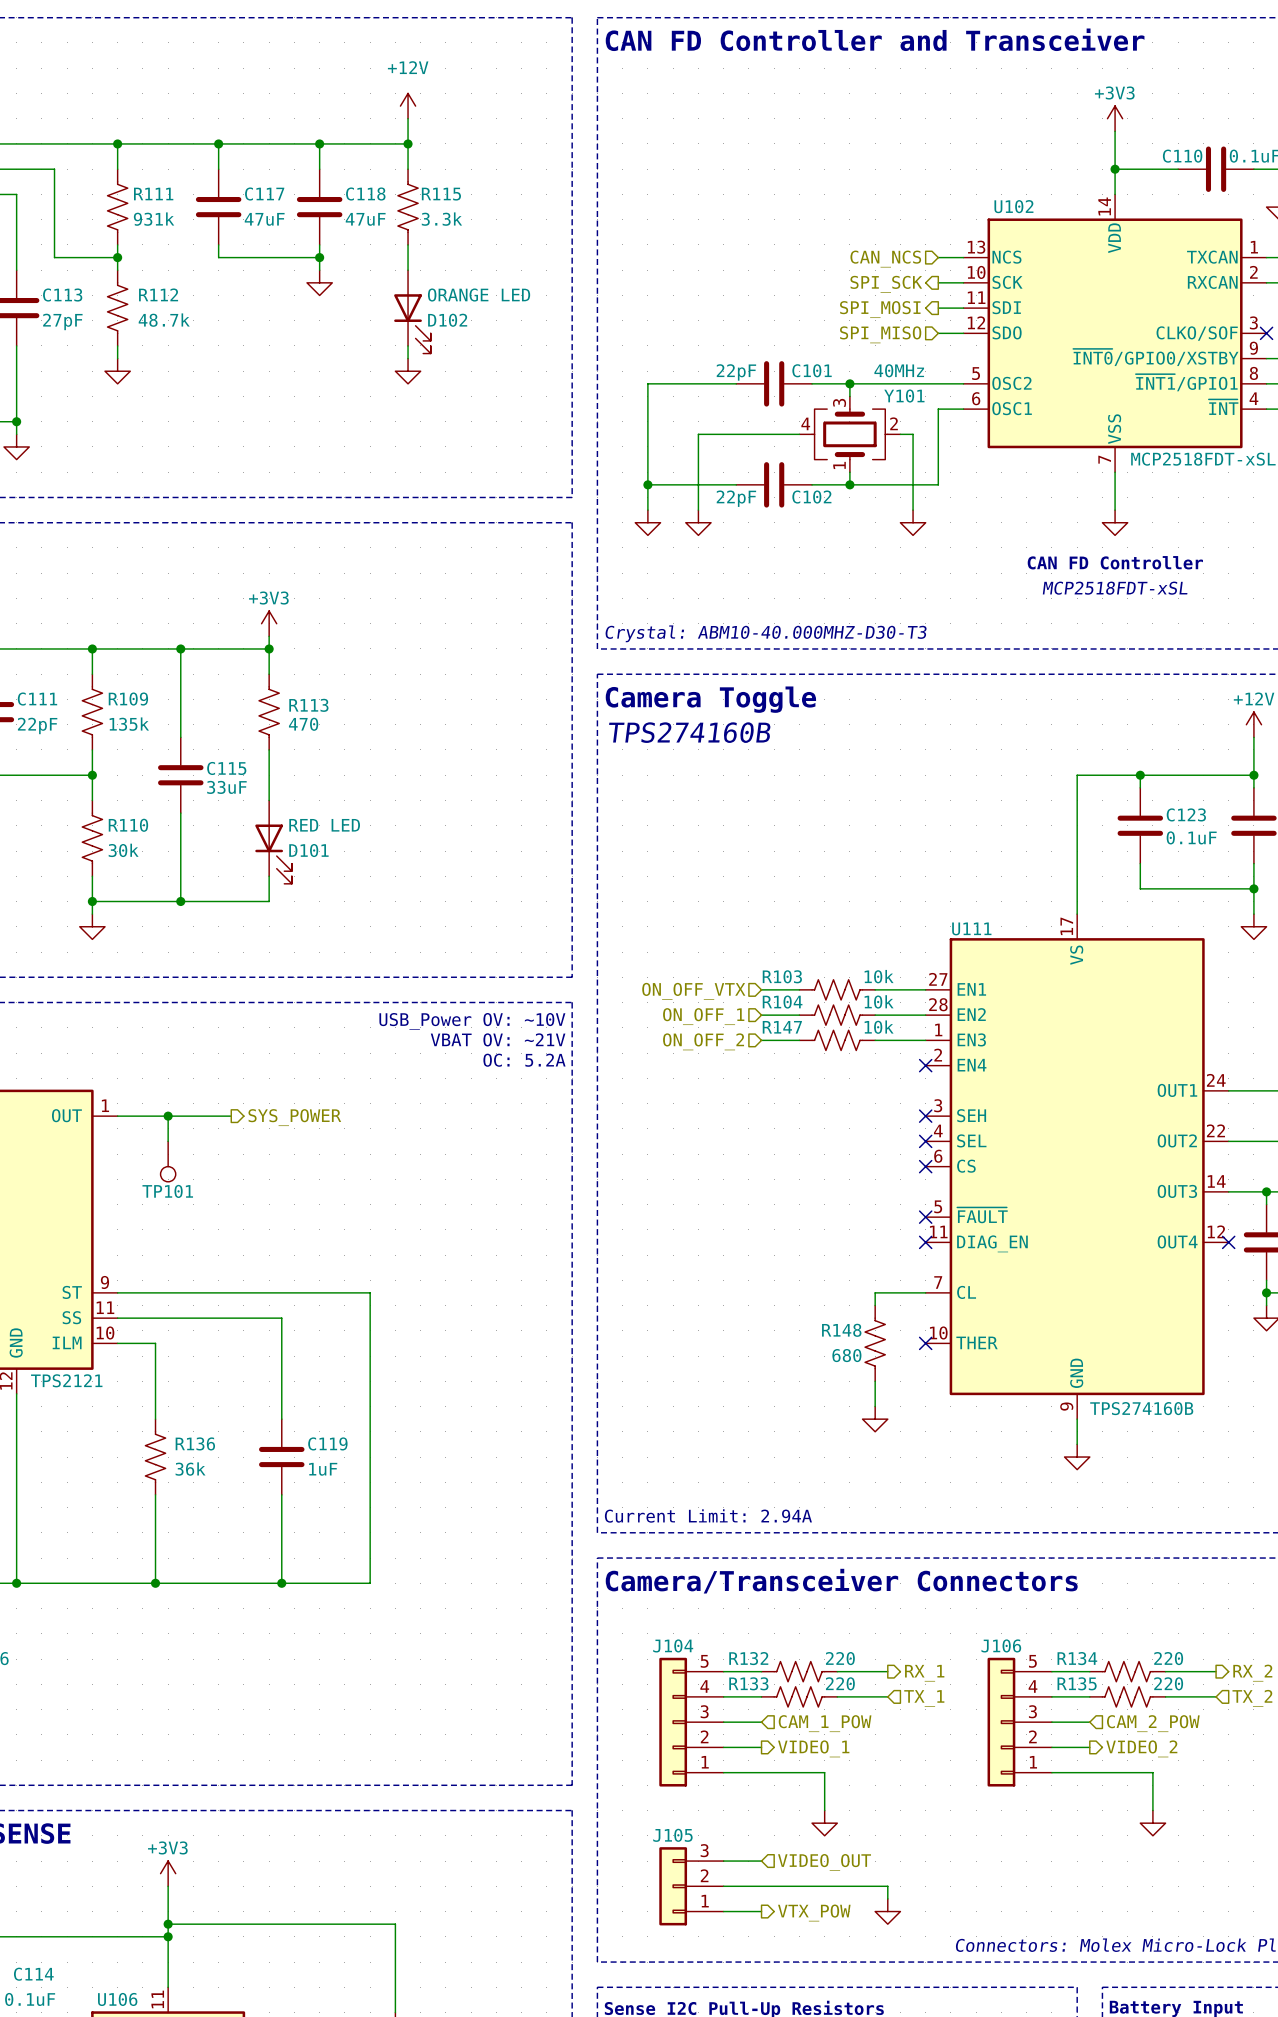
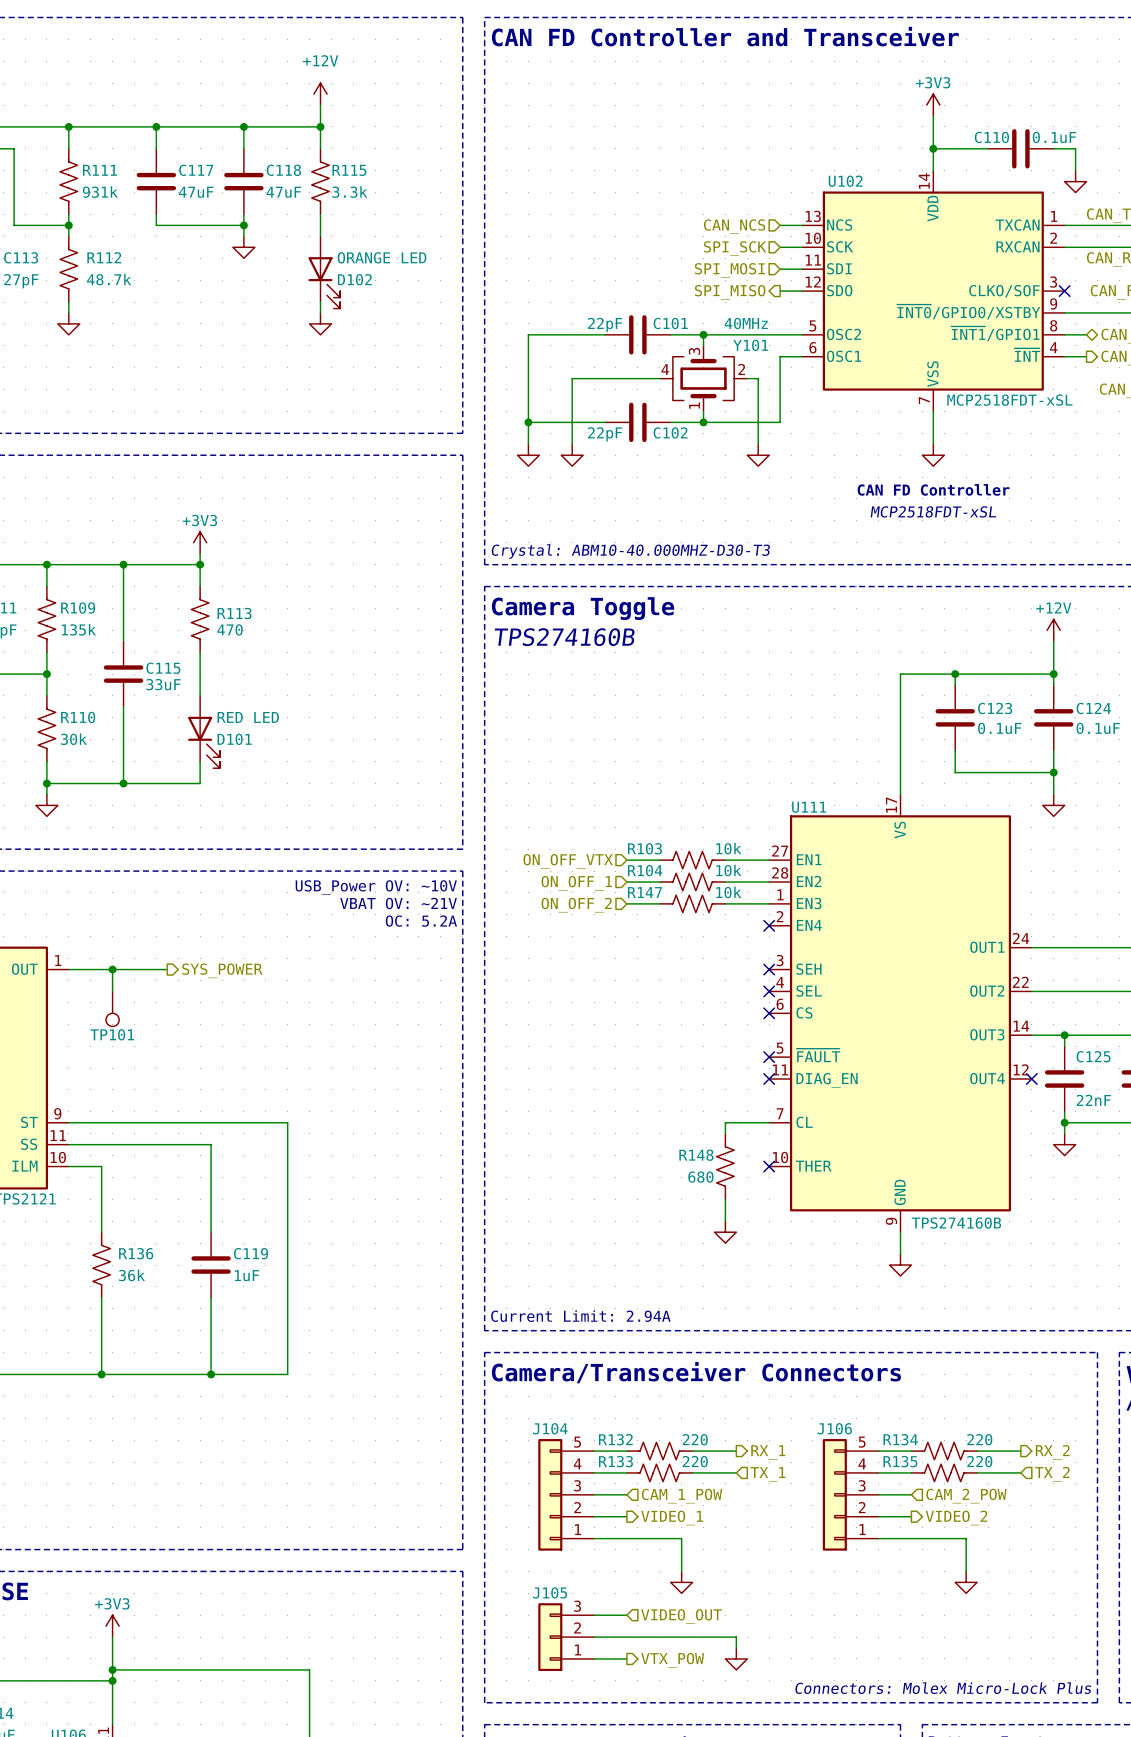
hierarchical label shape: output (886, 284) -> input (735, 248)
hierarchical label shape: output (880, 309) -> input (729, 270)
hierarchical label shape: input (880, 334) -> output (730, 292)

